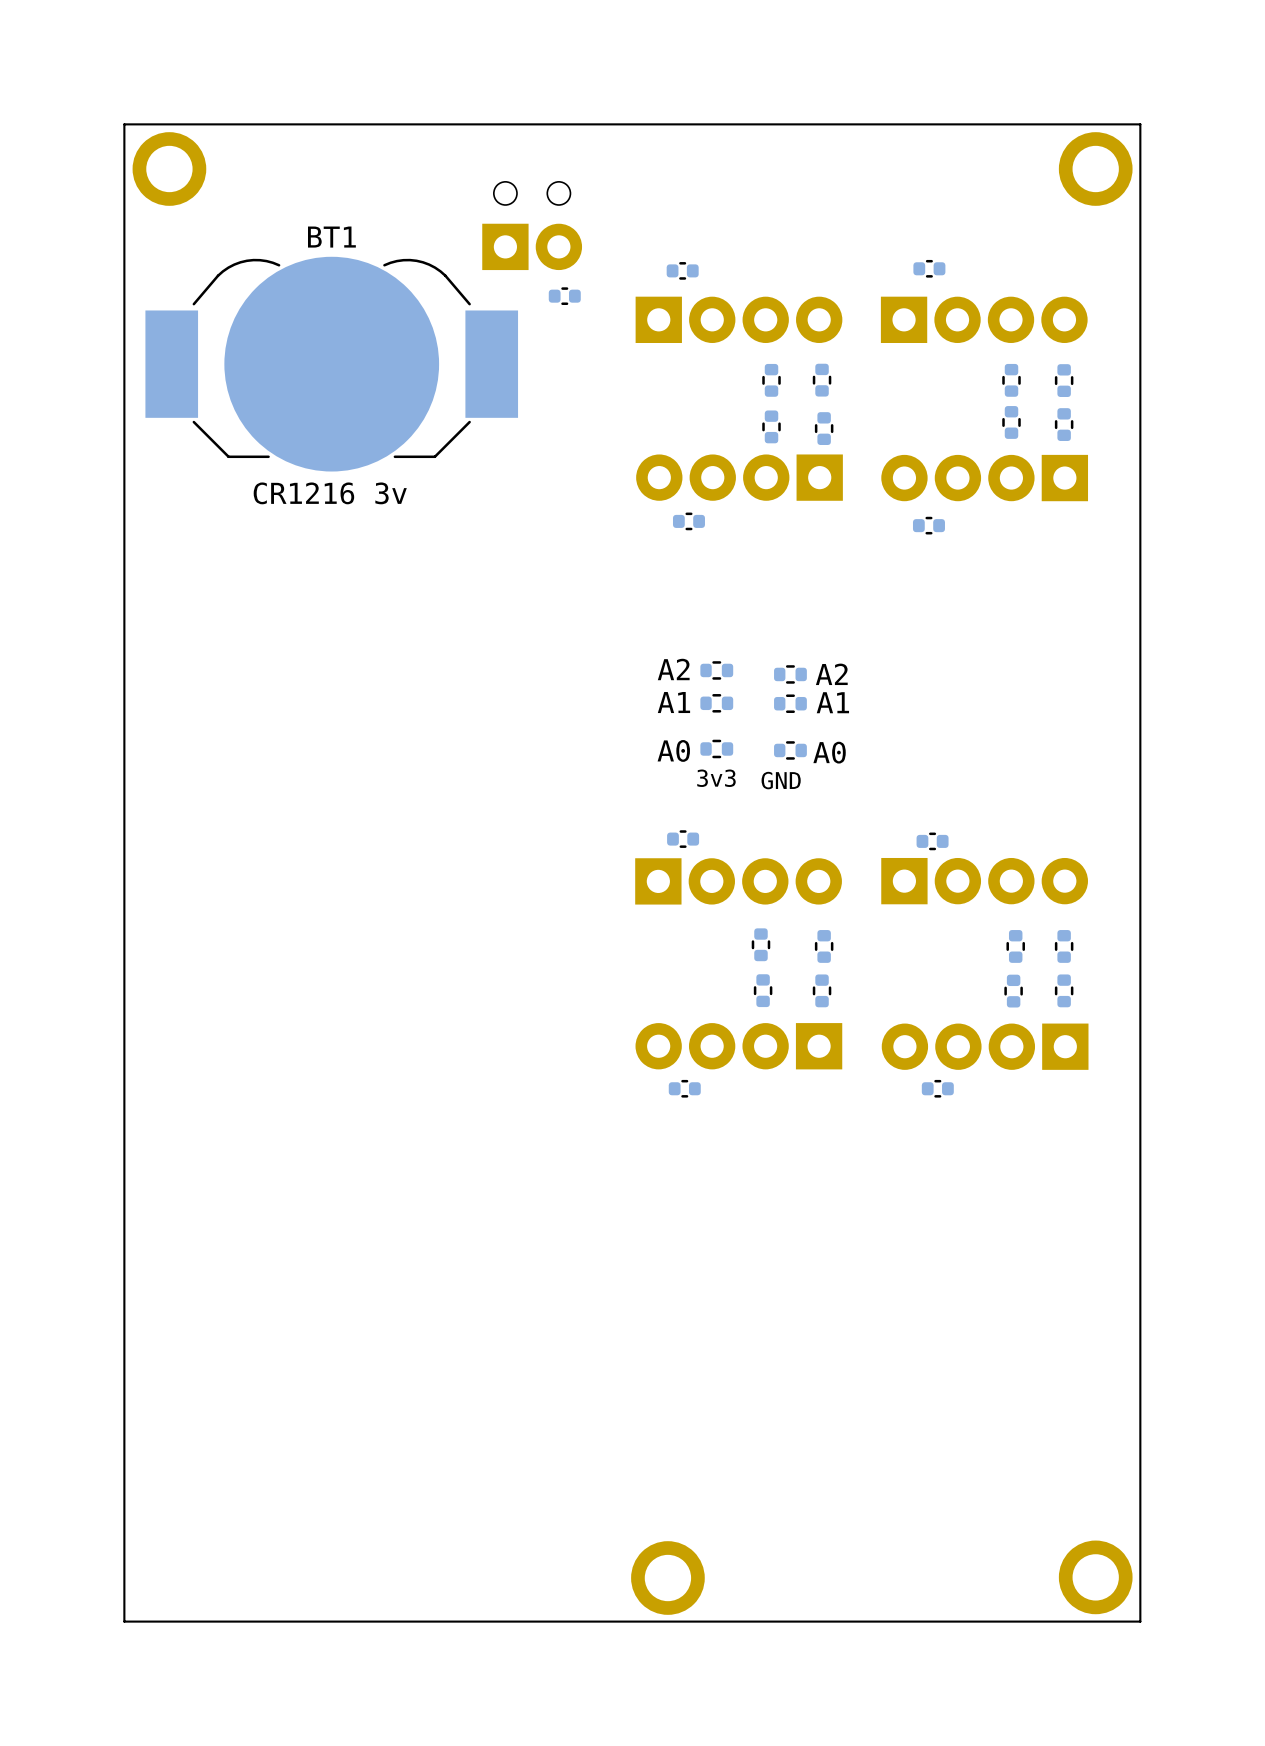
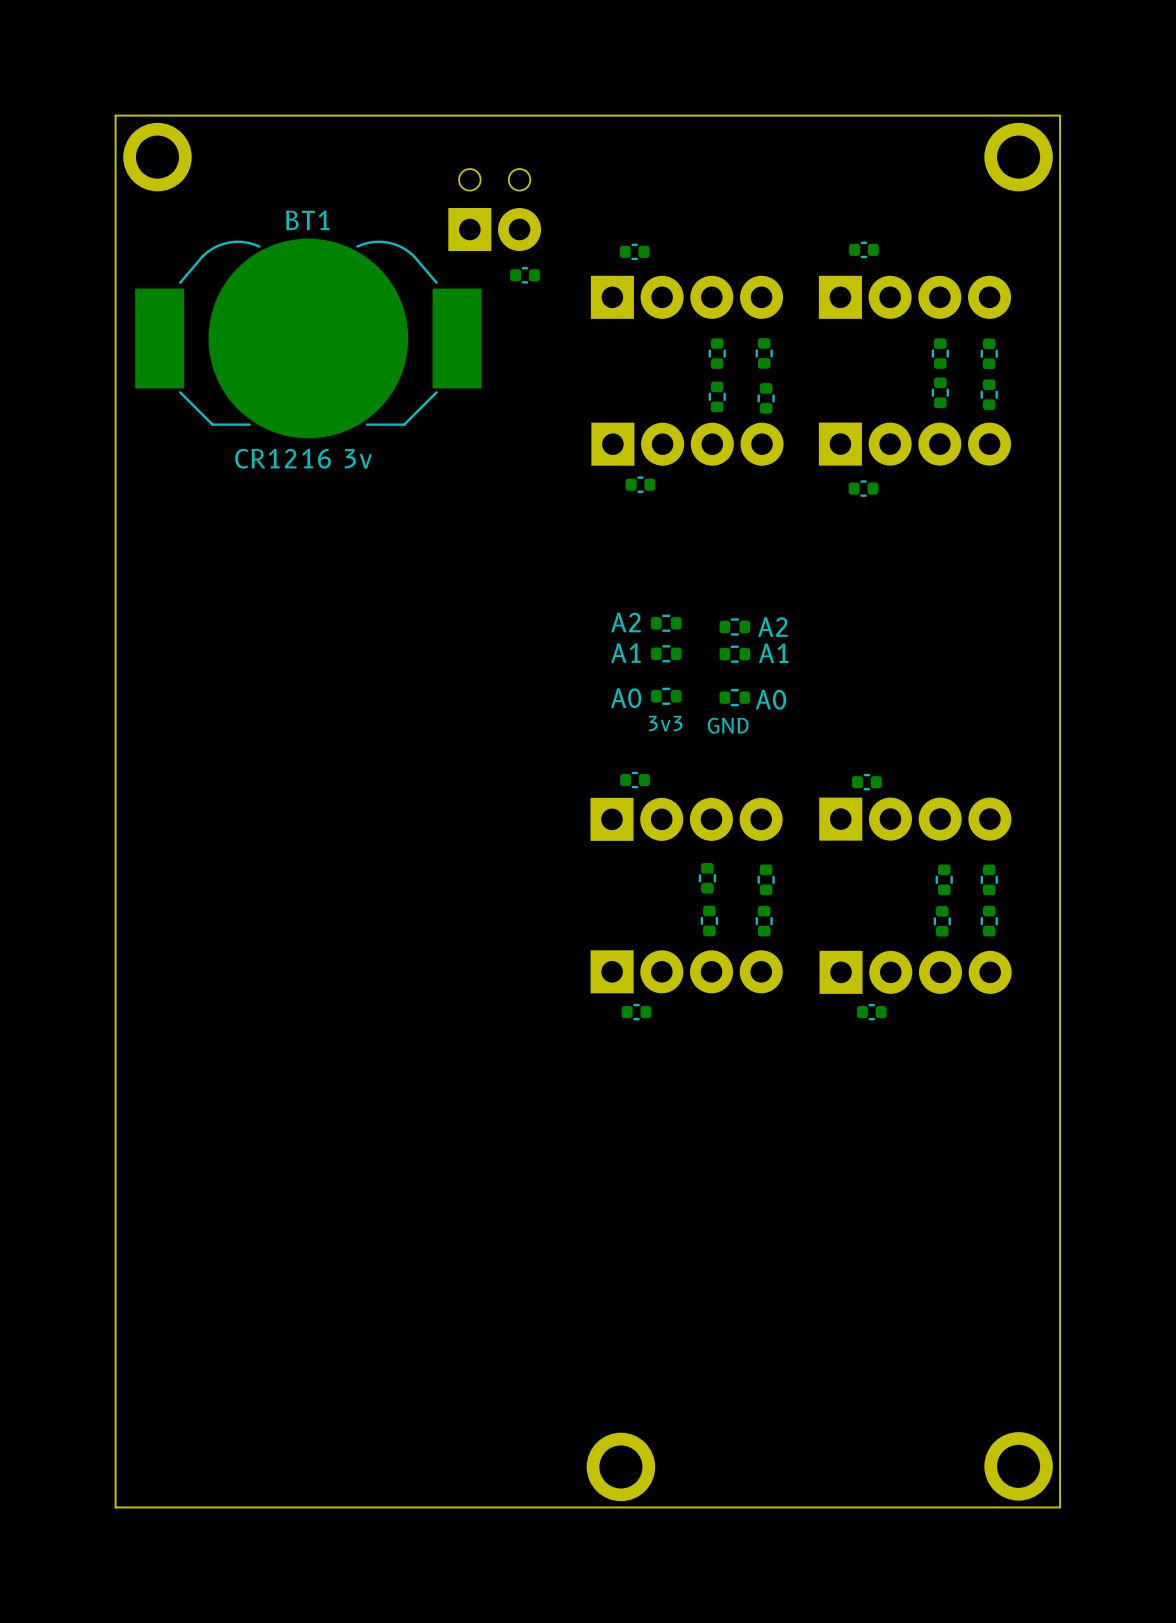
part rotation: 0° (739, 477) -> 180° (687, 444)
part rotation: 0° (984, 478) -> 180° (914, 444)
part rotation: 0° (738, 1046) -> 180° (686, 971)
part rotation: 0° (985, 1046) -> 180° (915, 972)

